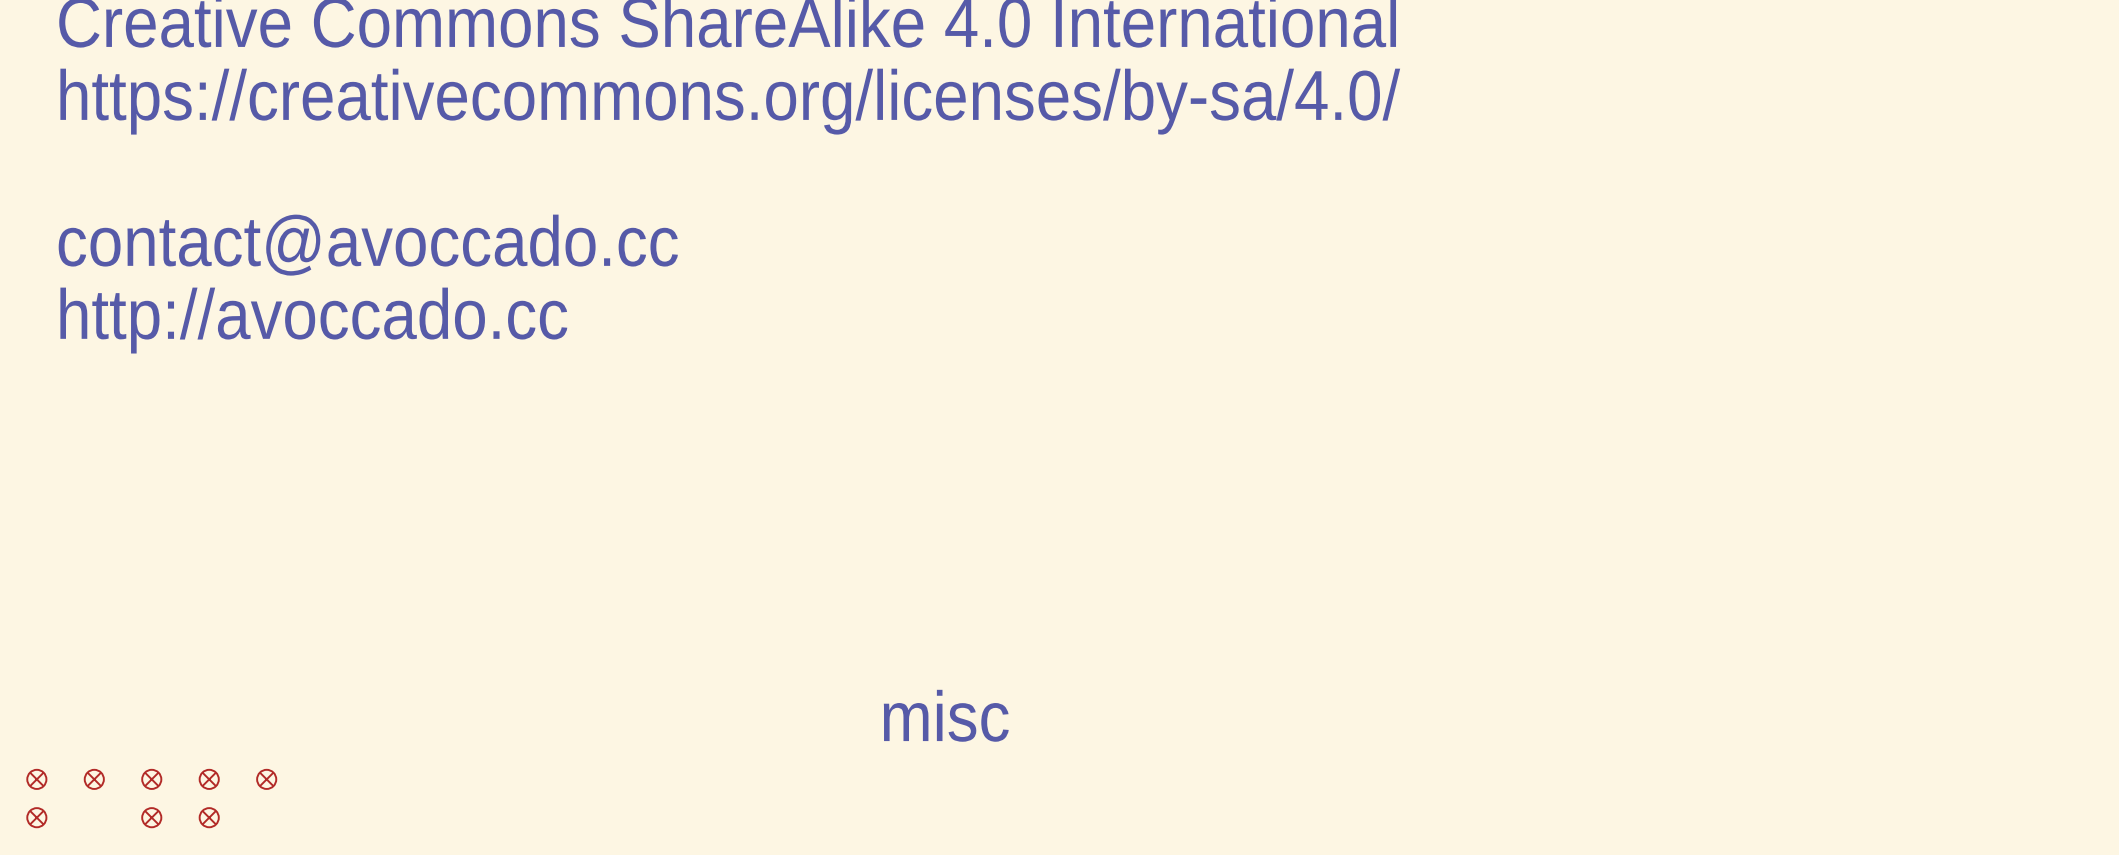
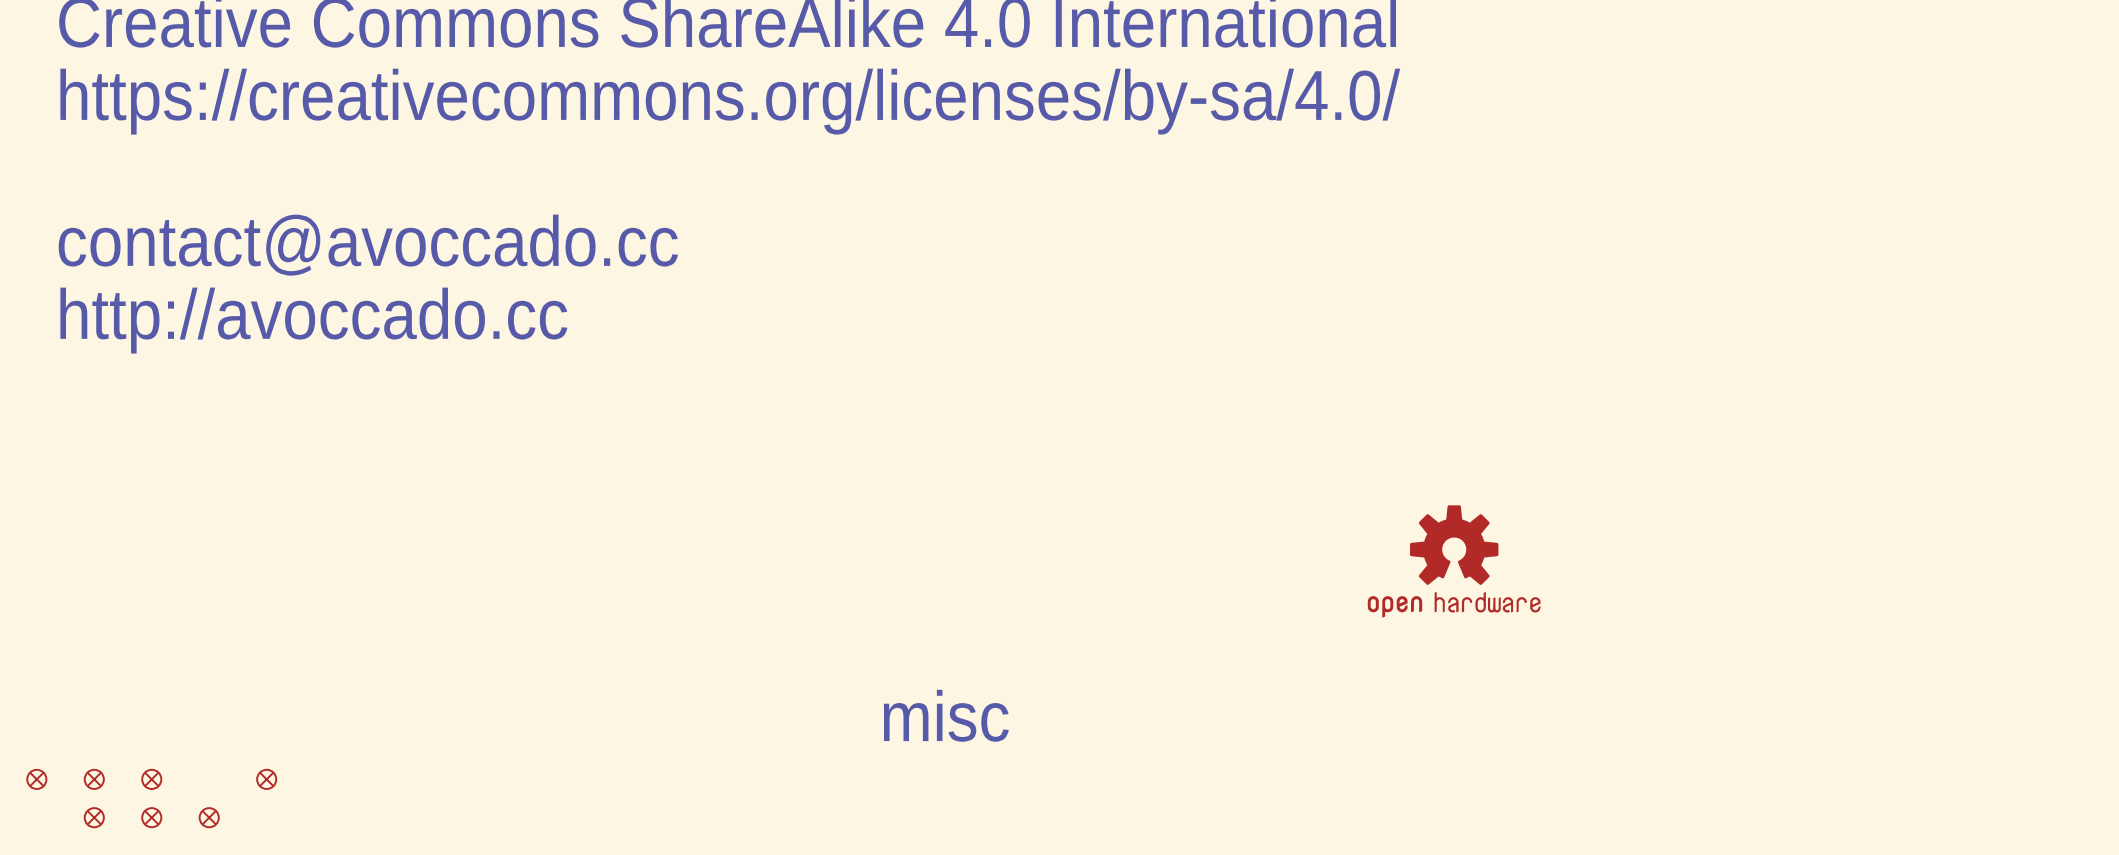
part: none -> (1454, 561)
part: (209, 779) -> none
part position: (36, 817) -> (94, 817)

